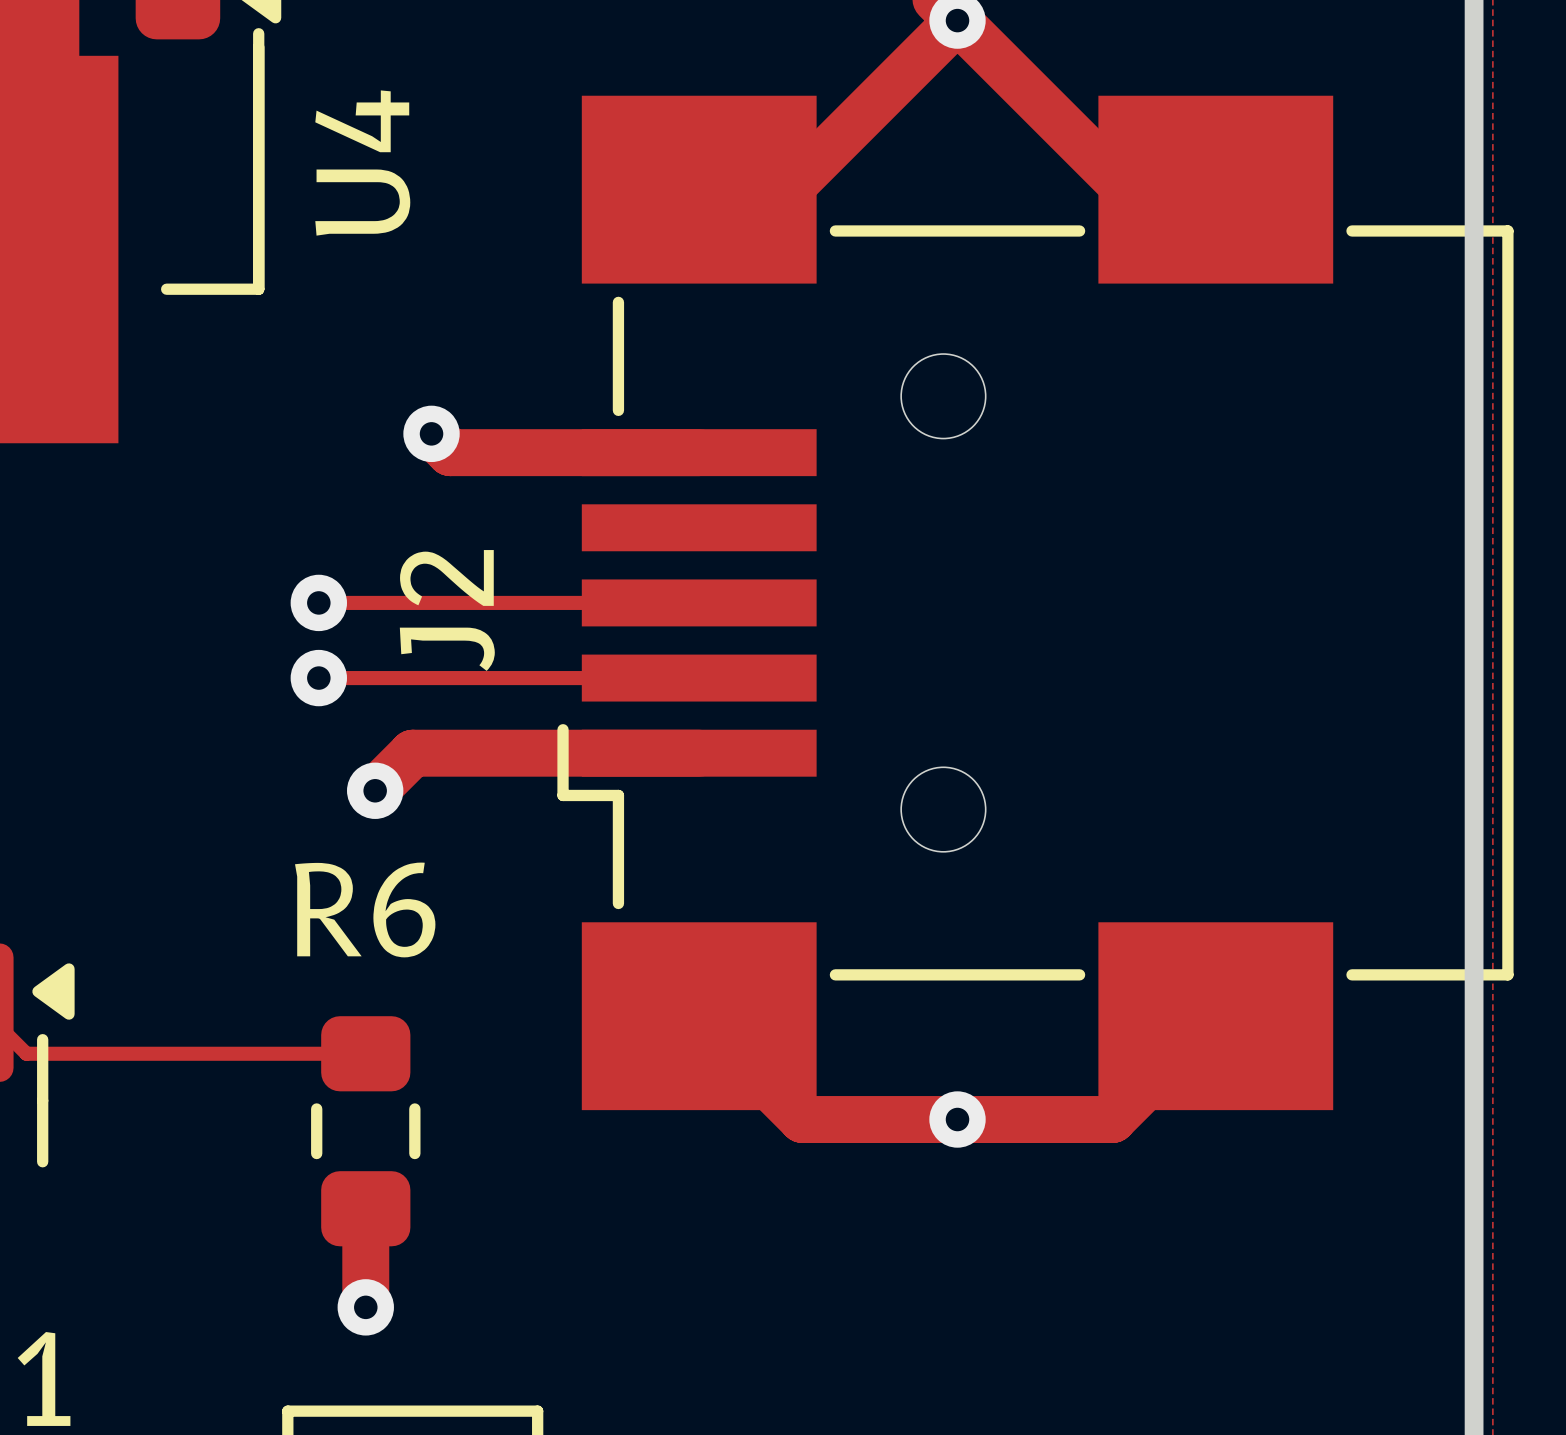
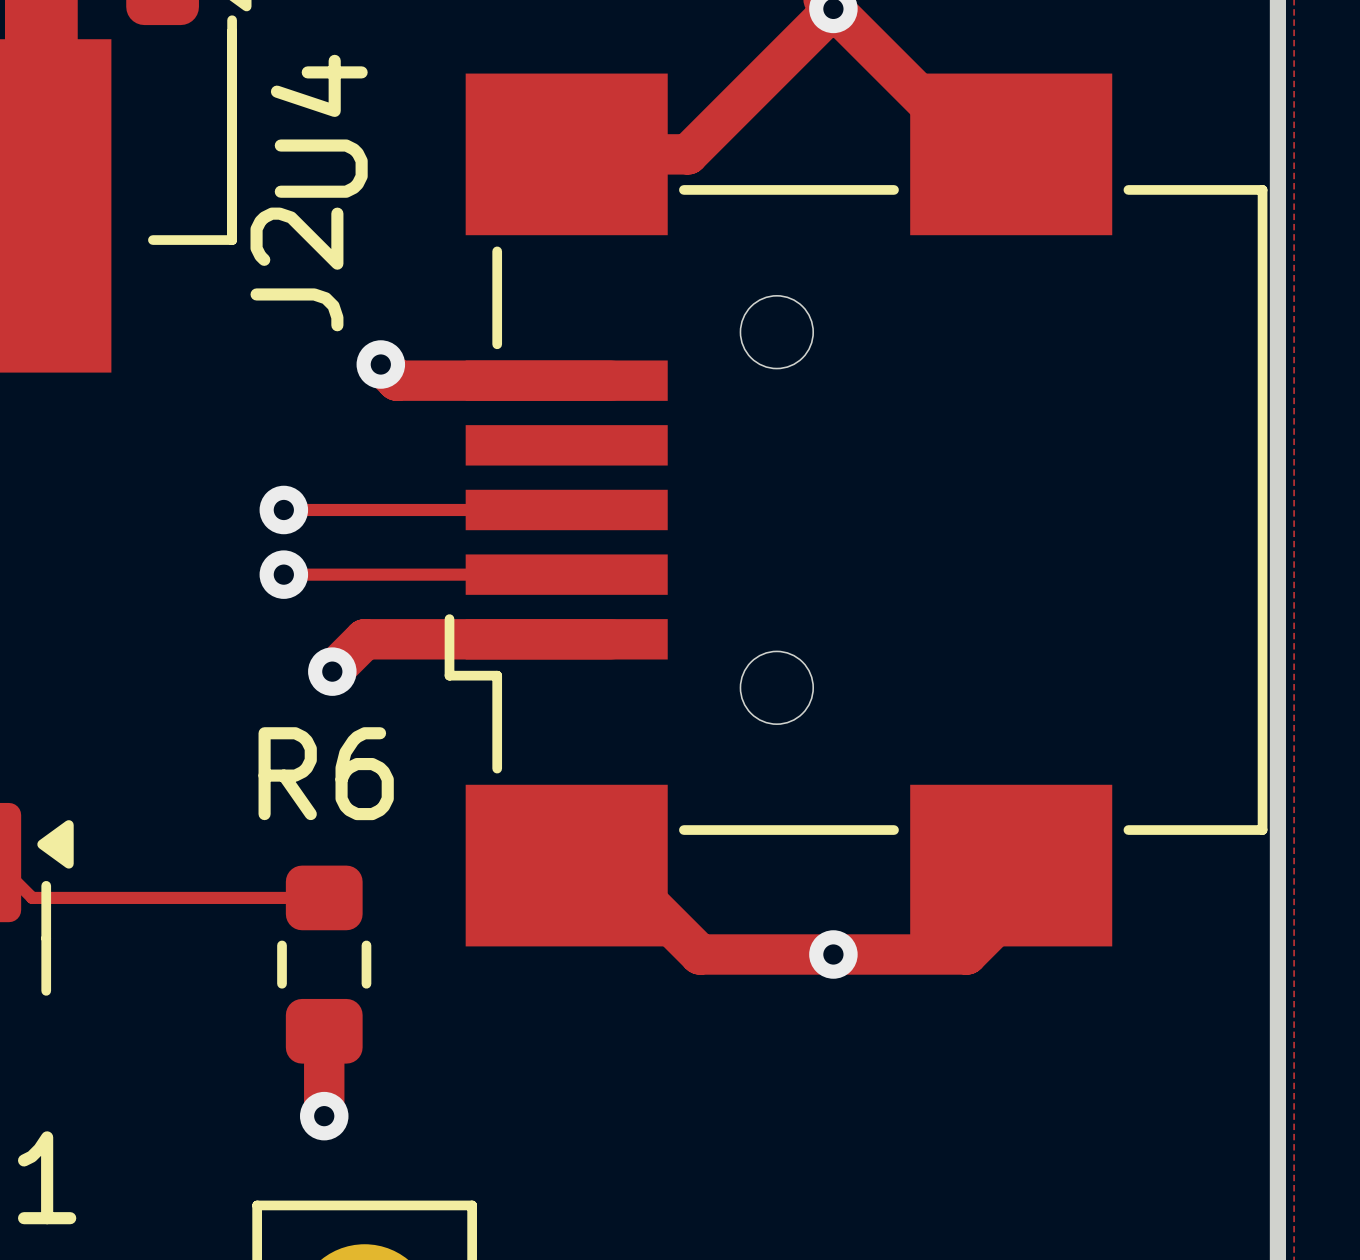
J2 position: (1035, 602) -> (856, 509)
J2 name position: J2 (447, 610) -> J2 (296, 269)

